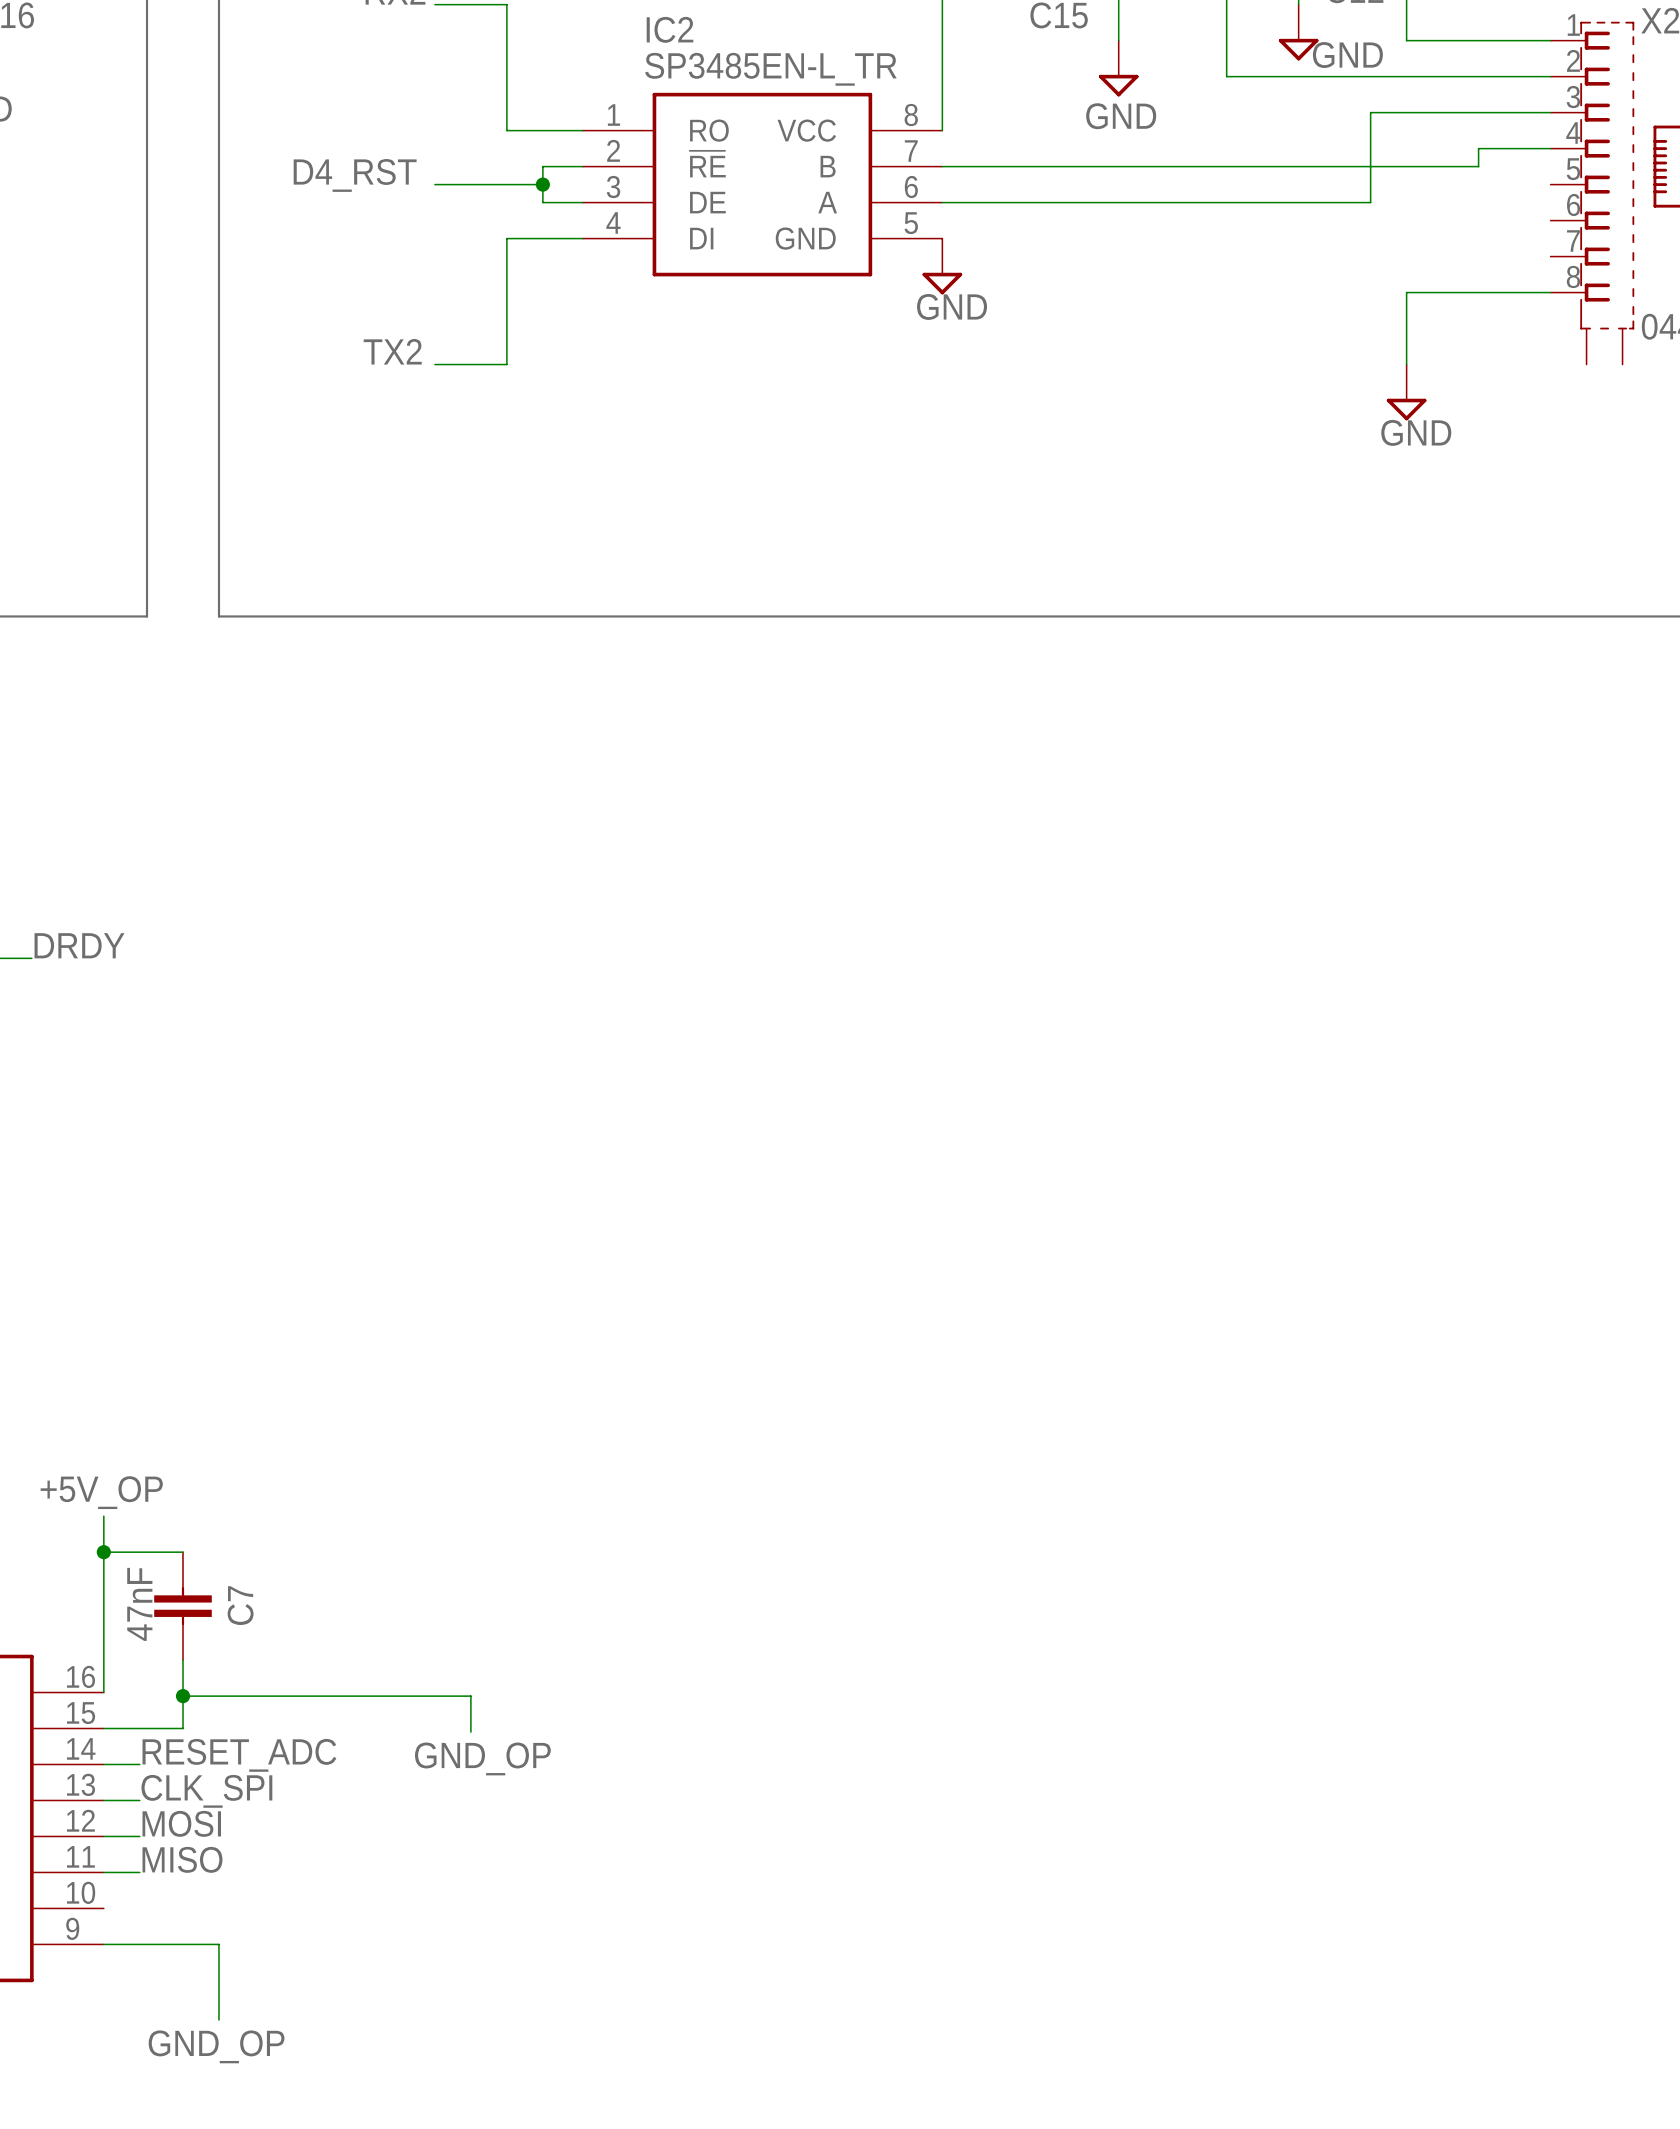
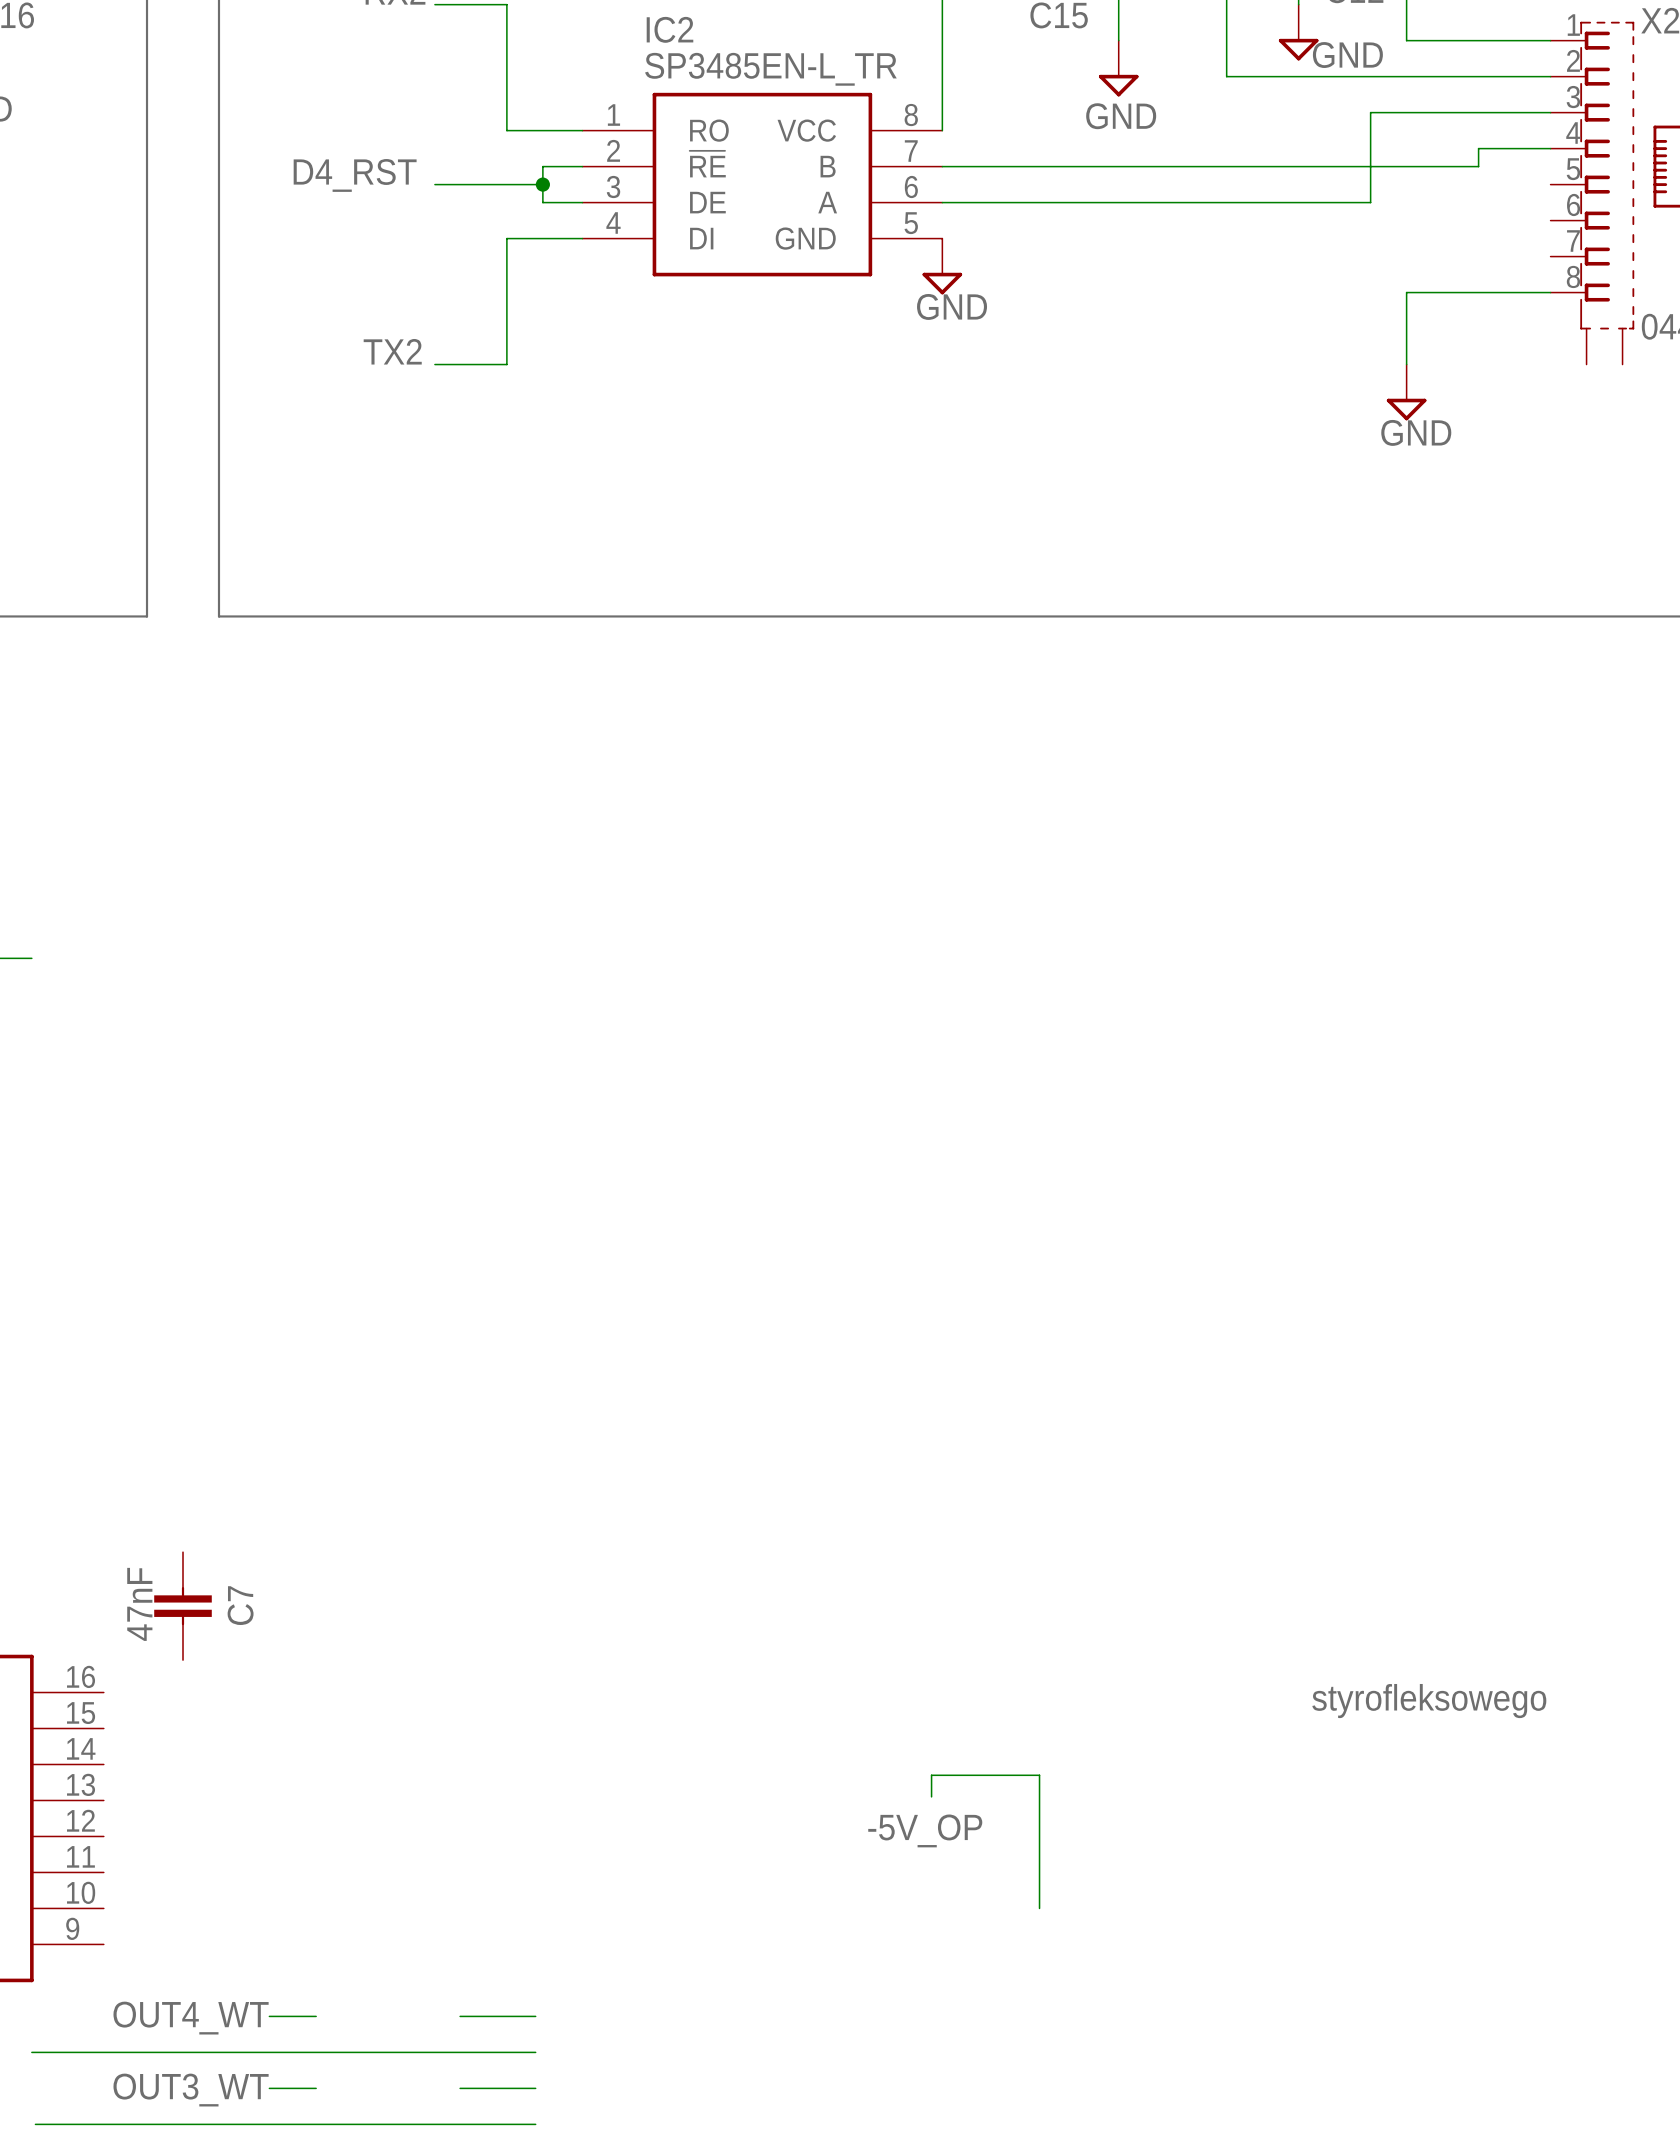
label: DRDY (79, 945) -> none
label: +5V_OP (101, 1492) -> none
wire: (103, 1516) (103, 1692) -> none
wire: (103, 1552) (183, 1552) -> none
junction: (103, 1552) -> none
wire: (183, 1660) (183, 1728) (103, 1728) -> none
wire: (183, 1696) (470, 1696) (470, 1732) -> none
junction: (183, 1696) -> none
text: none -> styrofleksowego (1429, 1701)
label: RESET_ADC (239, 1755) -> none
label: GND_OP (482, 1758) -> none
wire: (103, 1764) (139, 1764) -> none
label: CLK_SPI (206, 1791) -> none
wire: none -> (931, 1796) (931, 1775) (1039, 1775) (1039, 1908)
wire: (103, 1800) (139, 1800) -> none
label: MOSI (181, 1823) -> none
label: none -> -5V_OP (925, 1830)
wire: (103, 1836) (139, 1836) -> none
label: MISO (182, 1859) -> none
wire: (103, 1872) (139, 1872) -> none
wire: (103, 1944) (218, 1944) (218, 2020) -> none
wire: none -> (269, 2016) (316, 2016)
wire: none -> (460, 2016) (535, 2016)
label: none -> OUT4_WT (191, 2018)
label: GND_OP (216, 2046) -> none
wire: none -> (31, 2052) (535, 2052)
wire: none -> (269, 2088) (316, 2088)
wire: none -> (460, 2088) (535, 2088)
label: none -> OUT3_WT (191, 2090)
wire: none -> (35, 2124) (535, 2124)

